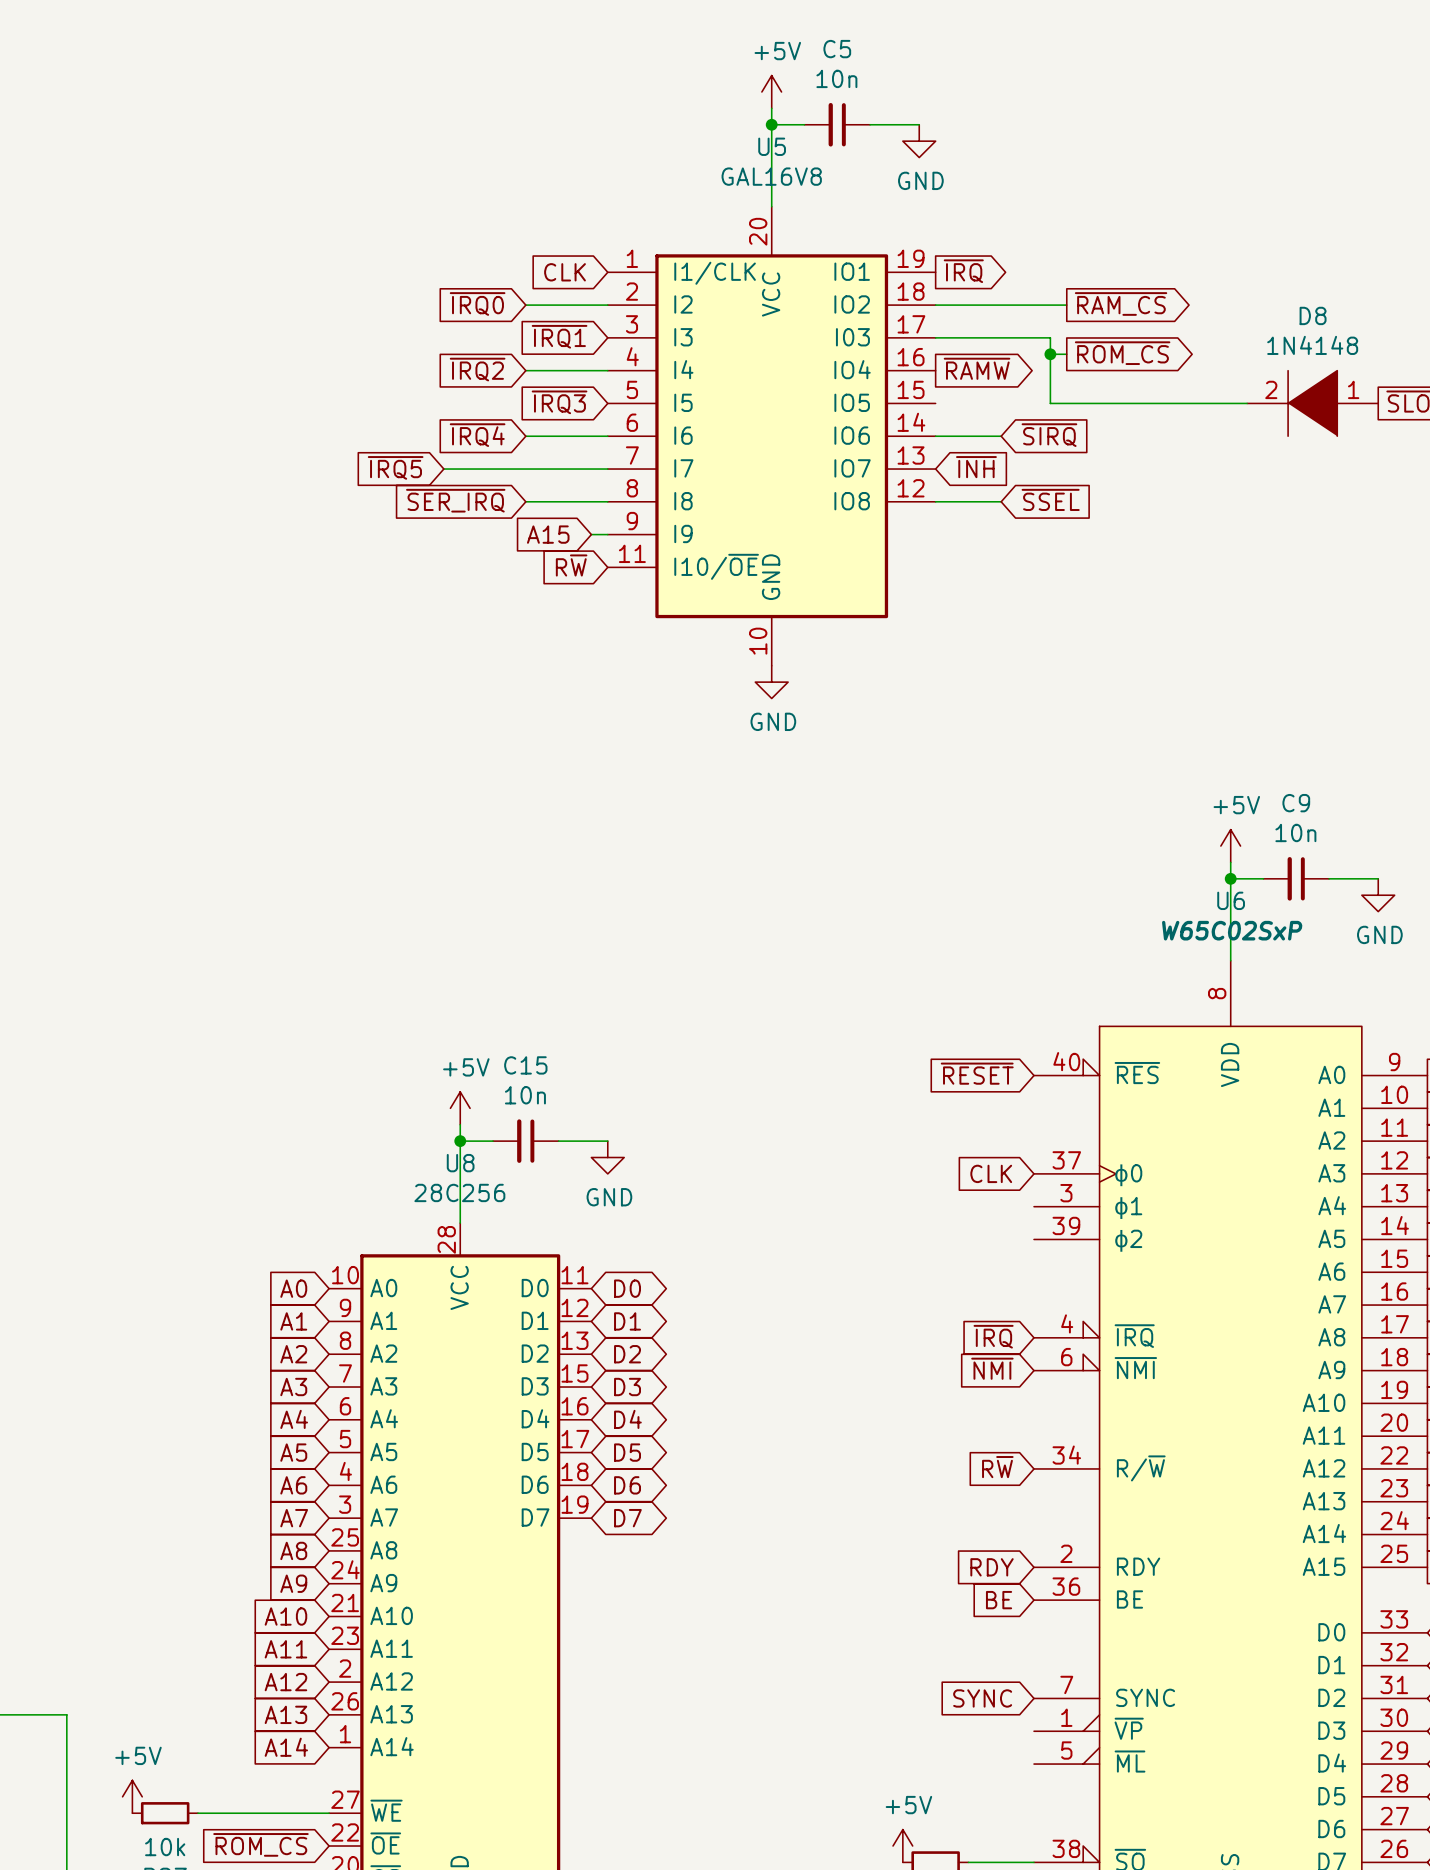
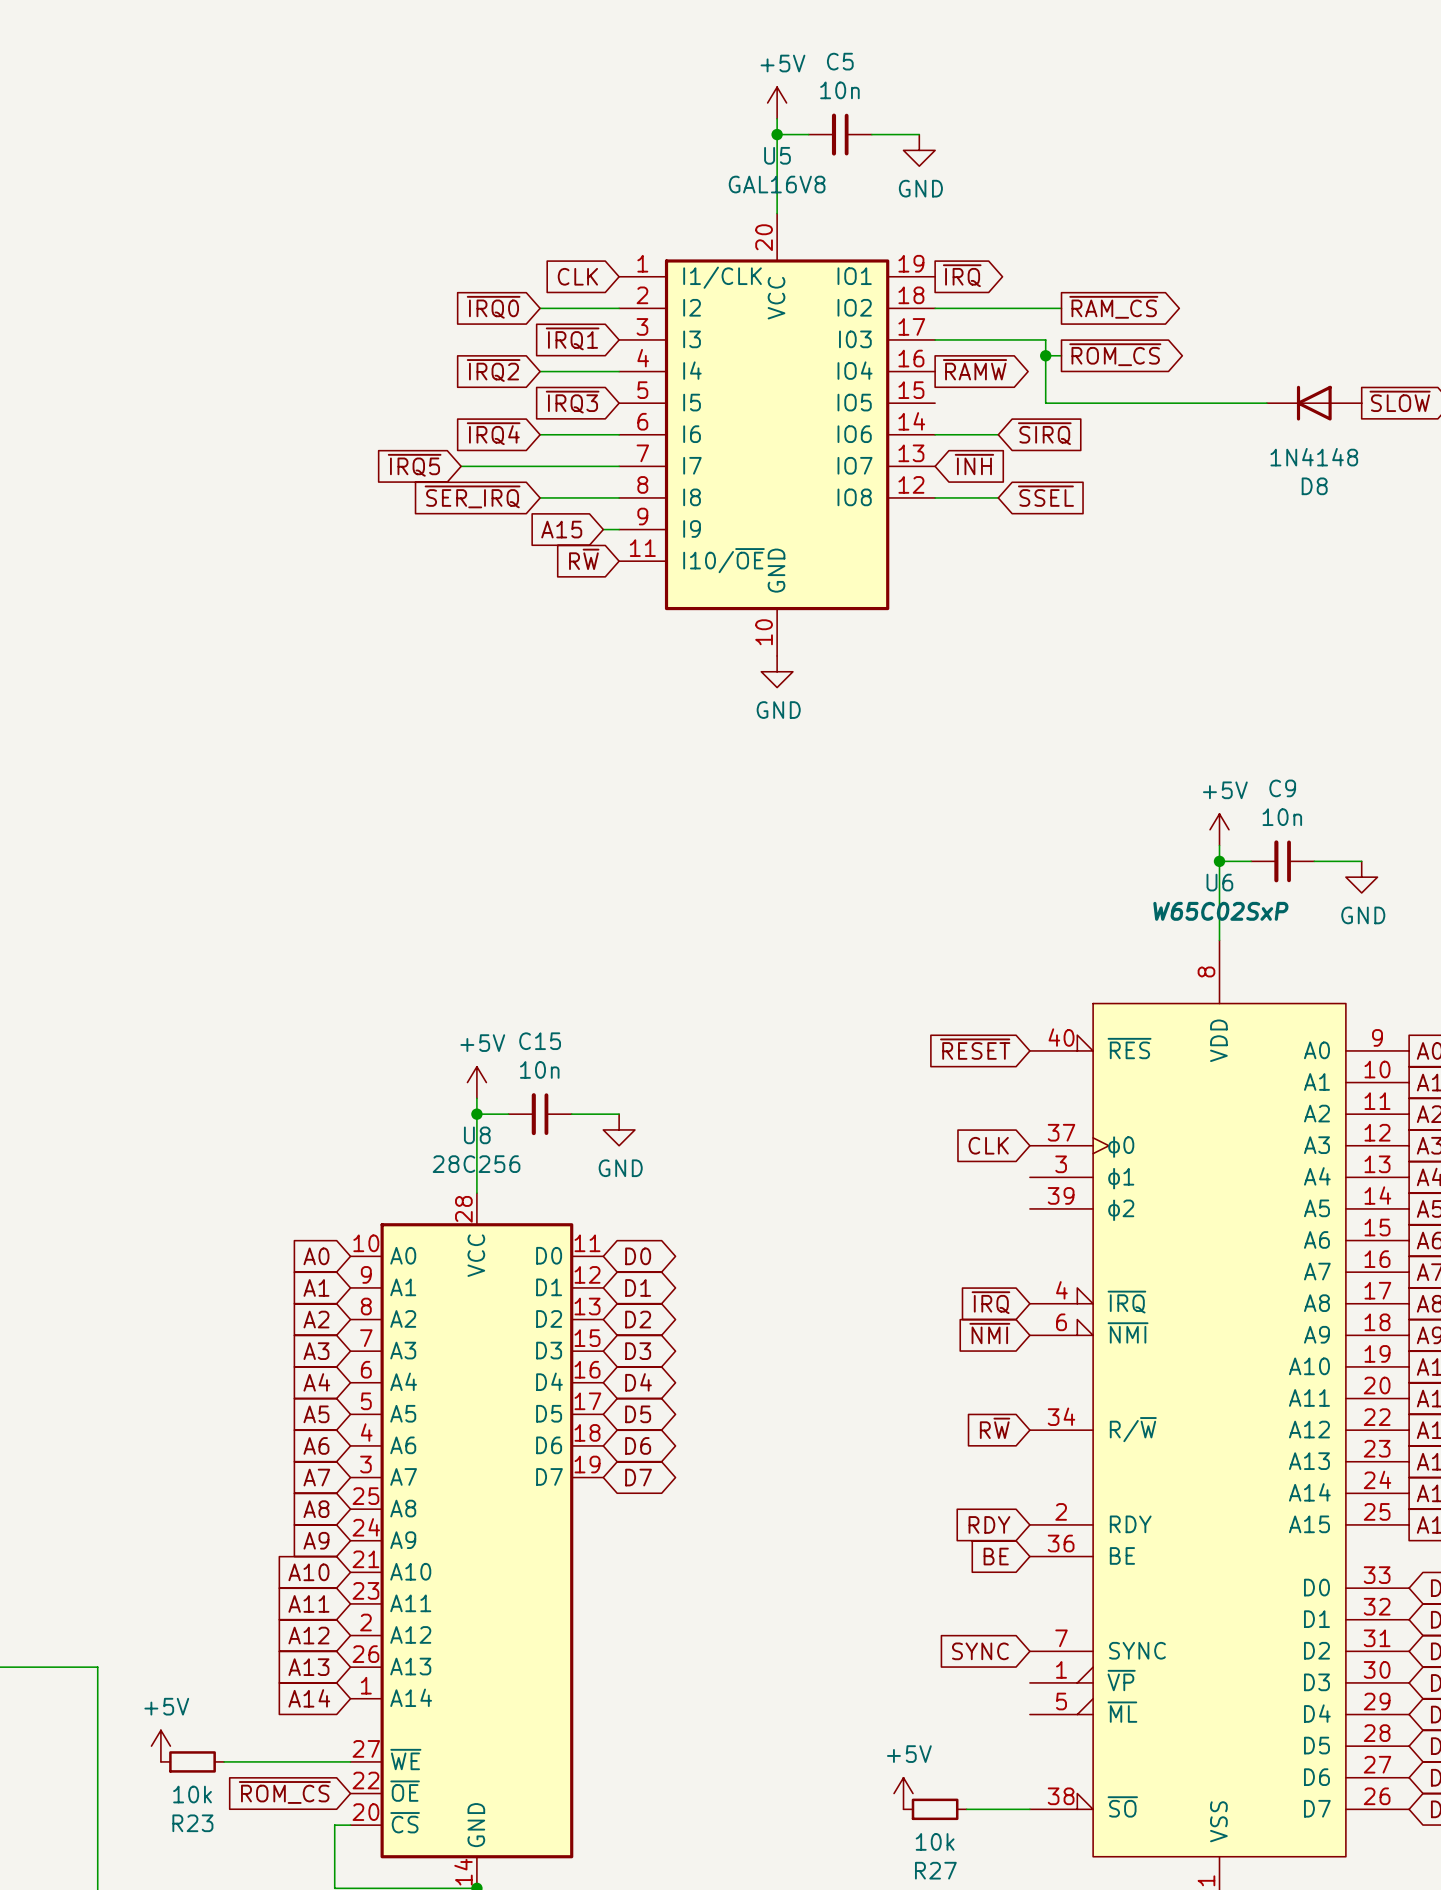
D8 name position: D8 (1313, 315) -> D8 (1314, 486)
D8 value position: 1N4148 (1312, 345) -> 1N4148 (1314, 457)
D8 symbol: [1247, 370, 1379, 437] -> [1266, 385, 1362, 421]

